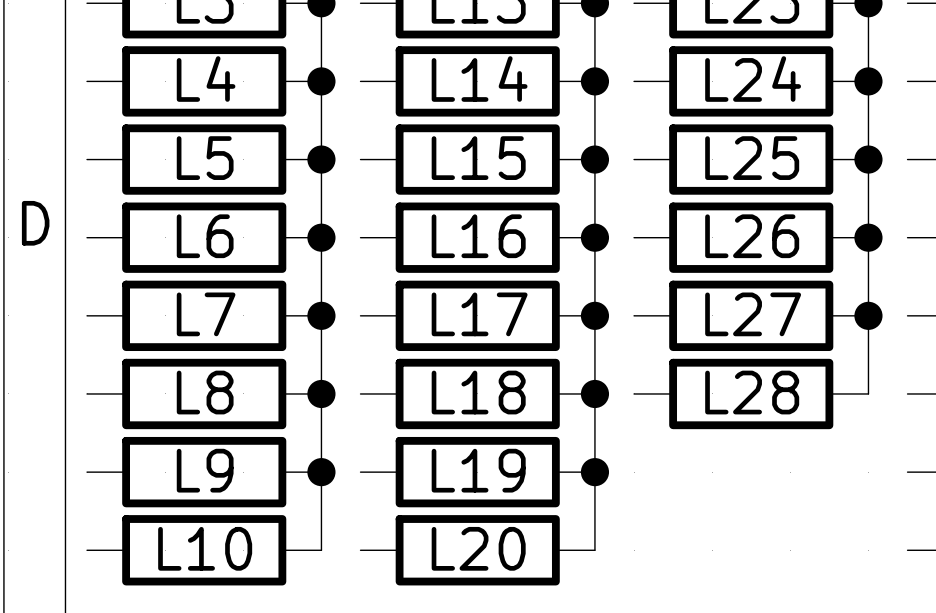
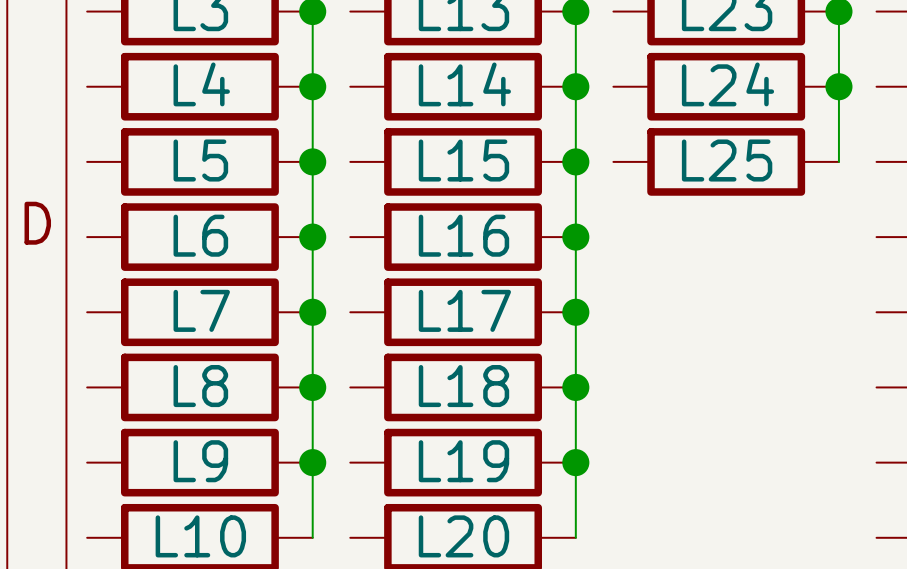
wire: (868, 159) (868, 393) -> none
junction: (868, 159) -> none
L26: (751, 237) -> none
junction: (868, 237) -> none
L27: (751, 315) -> none
junction: (868, 315) -> none
L28: (751, 393) -> none

